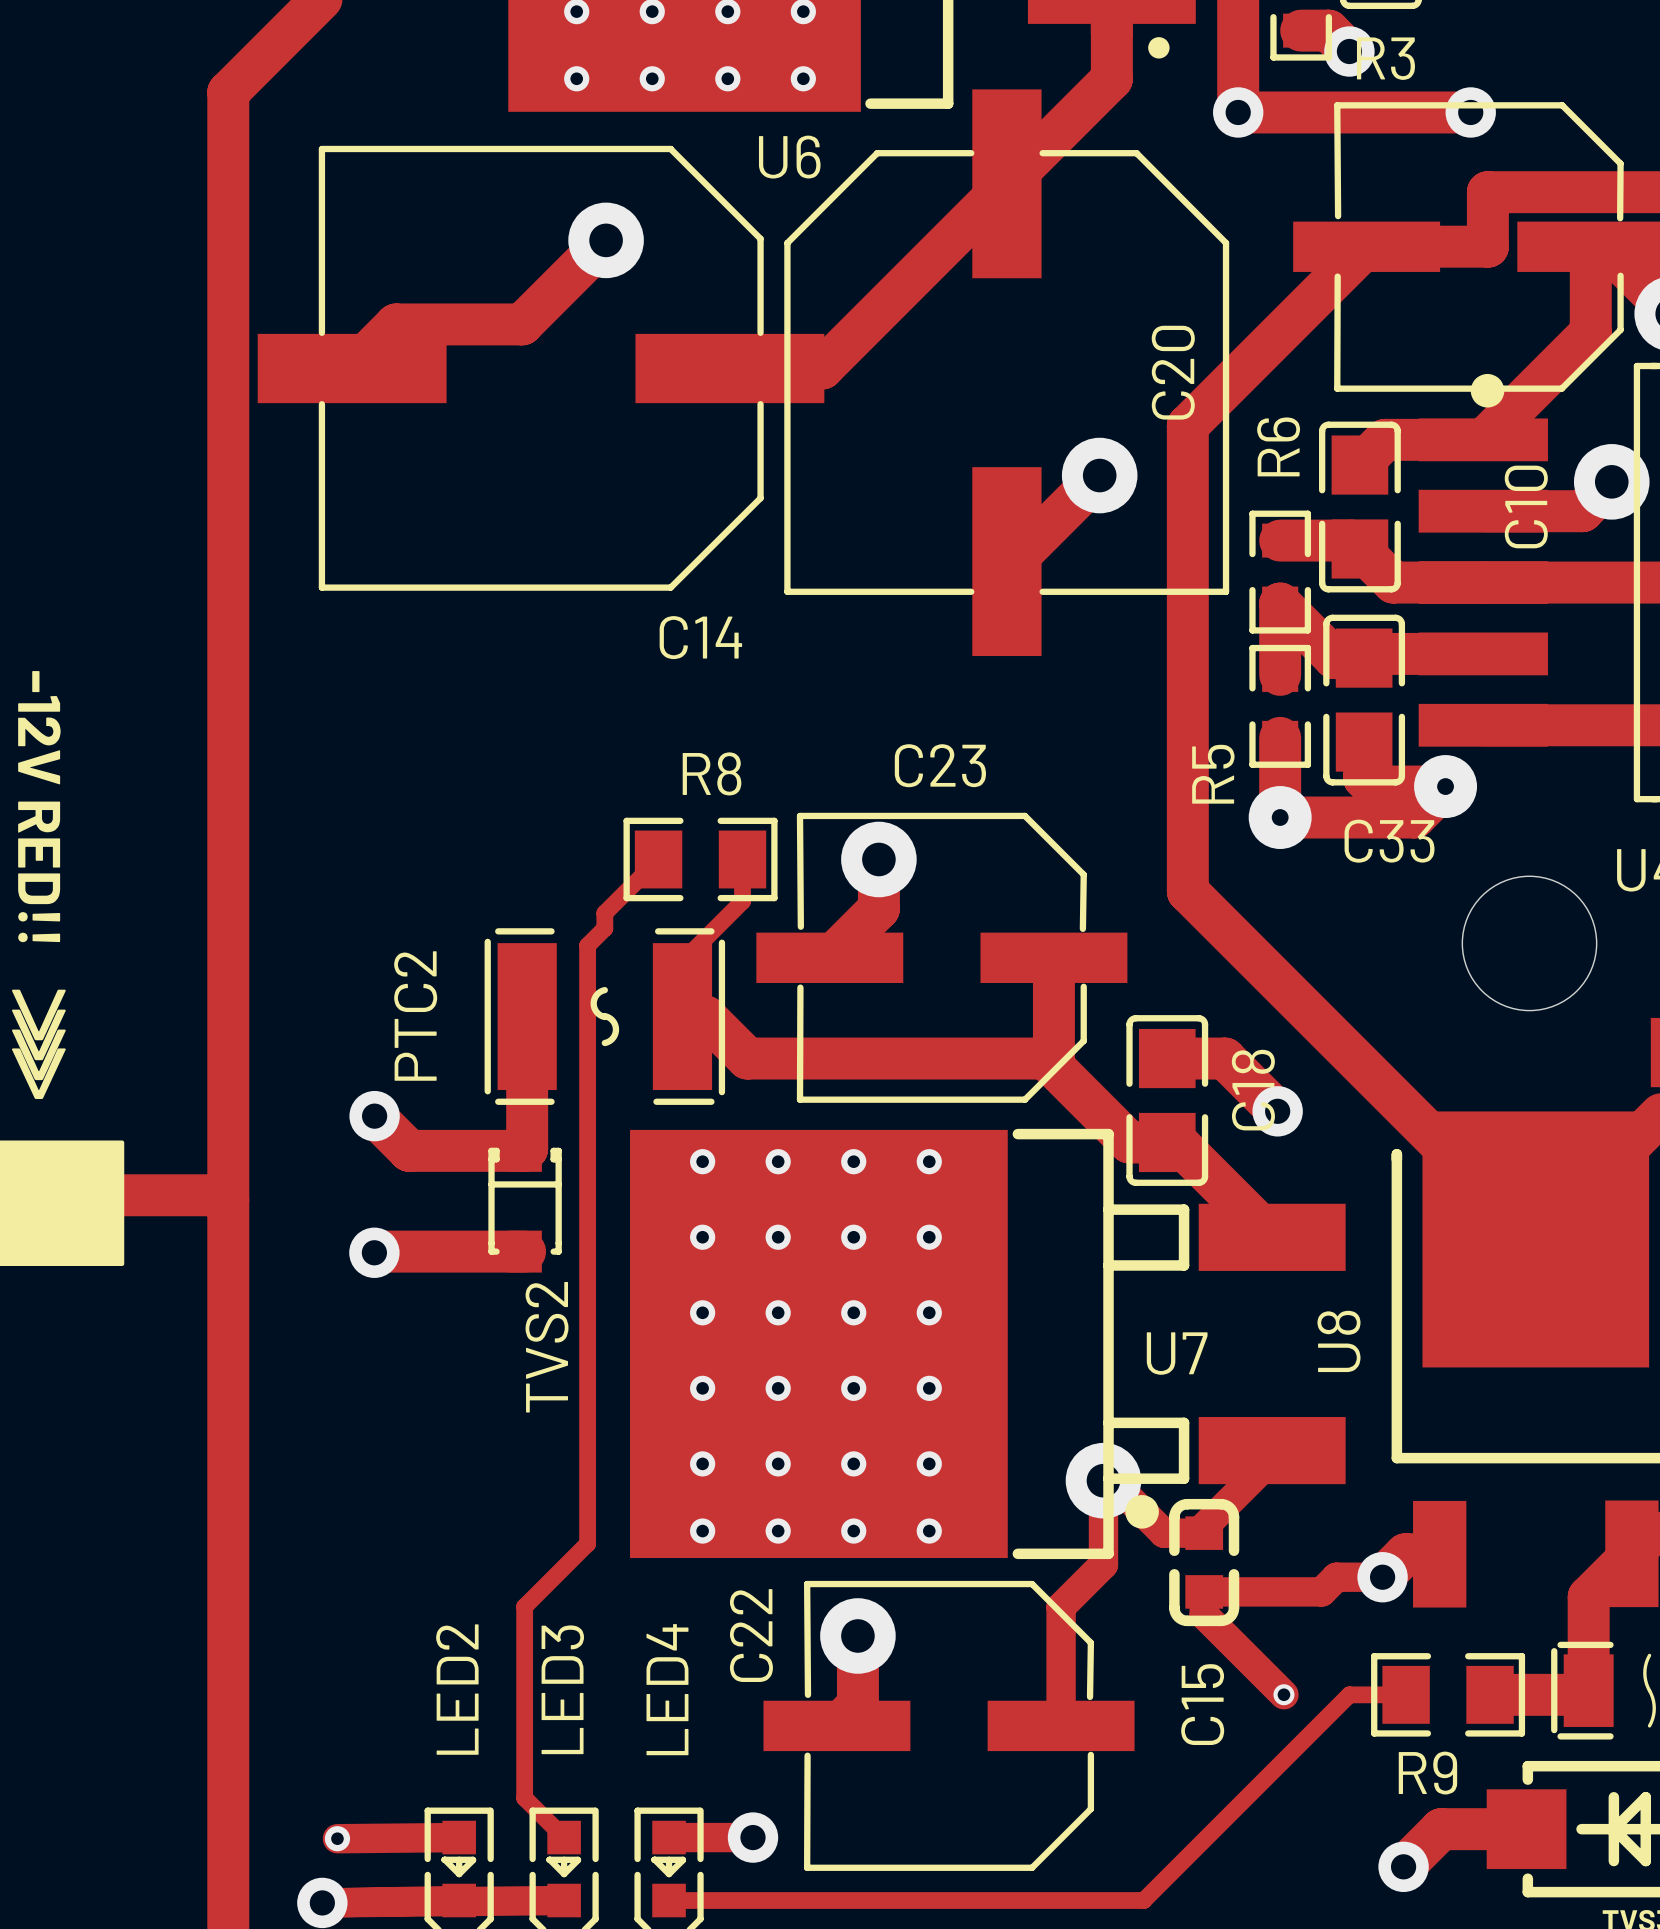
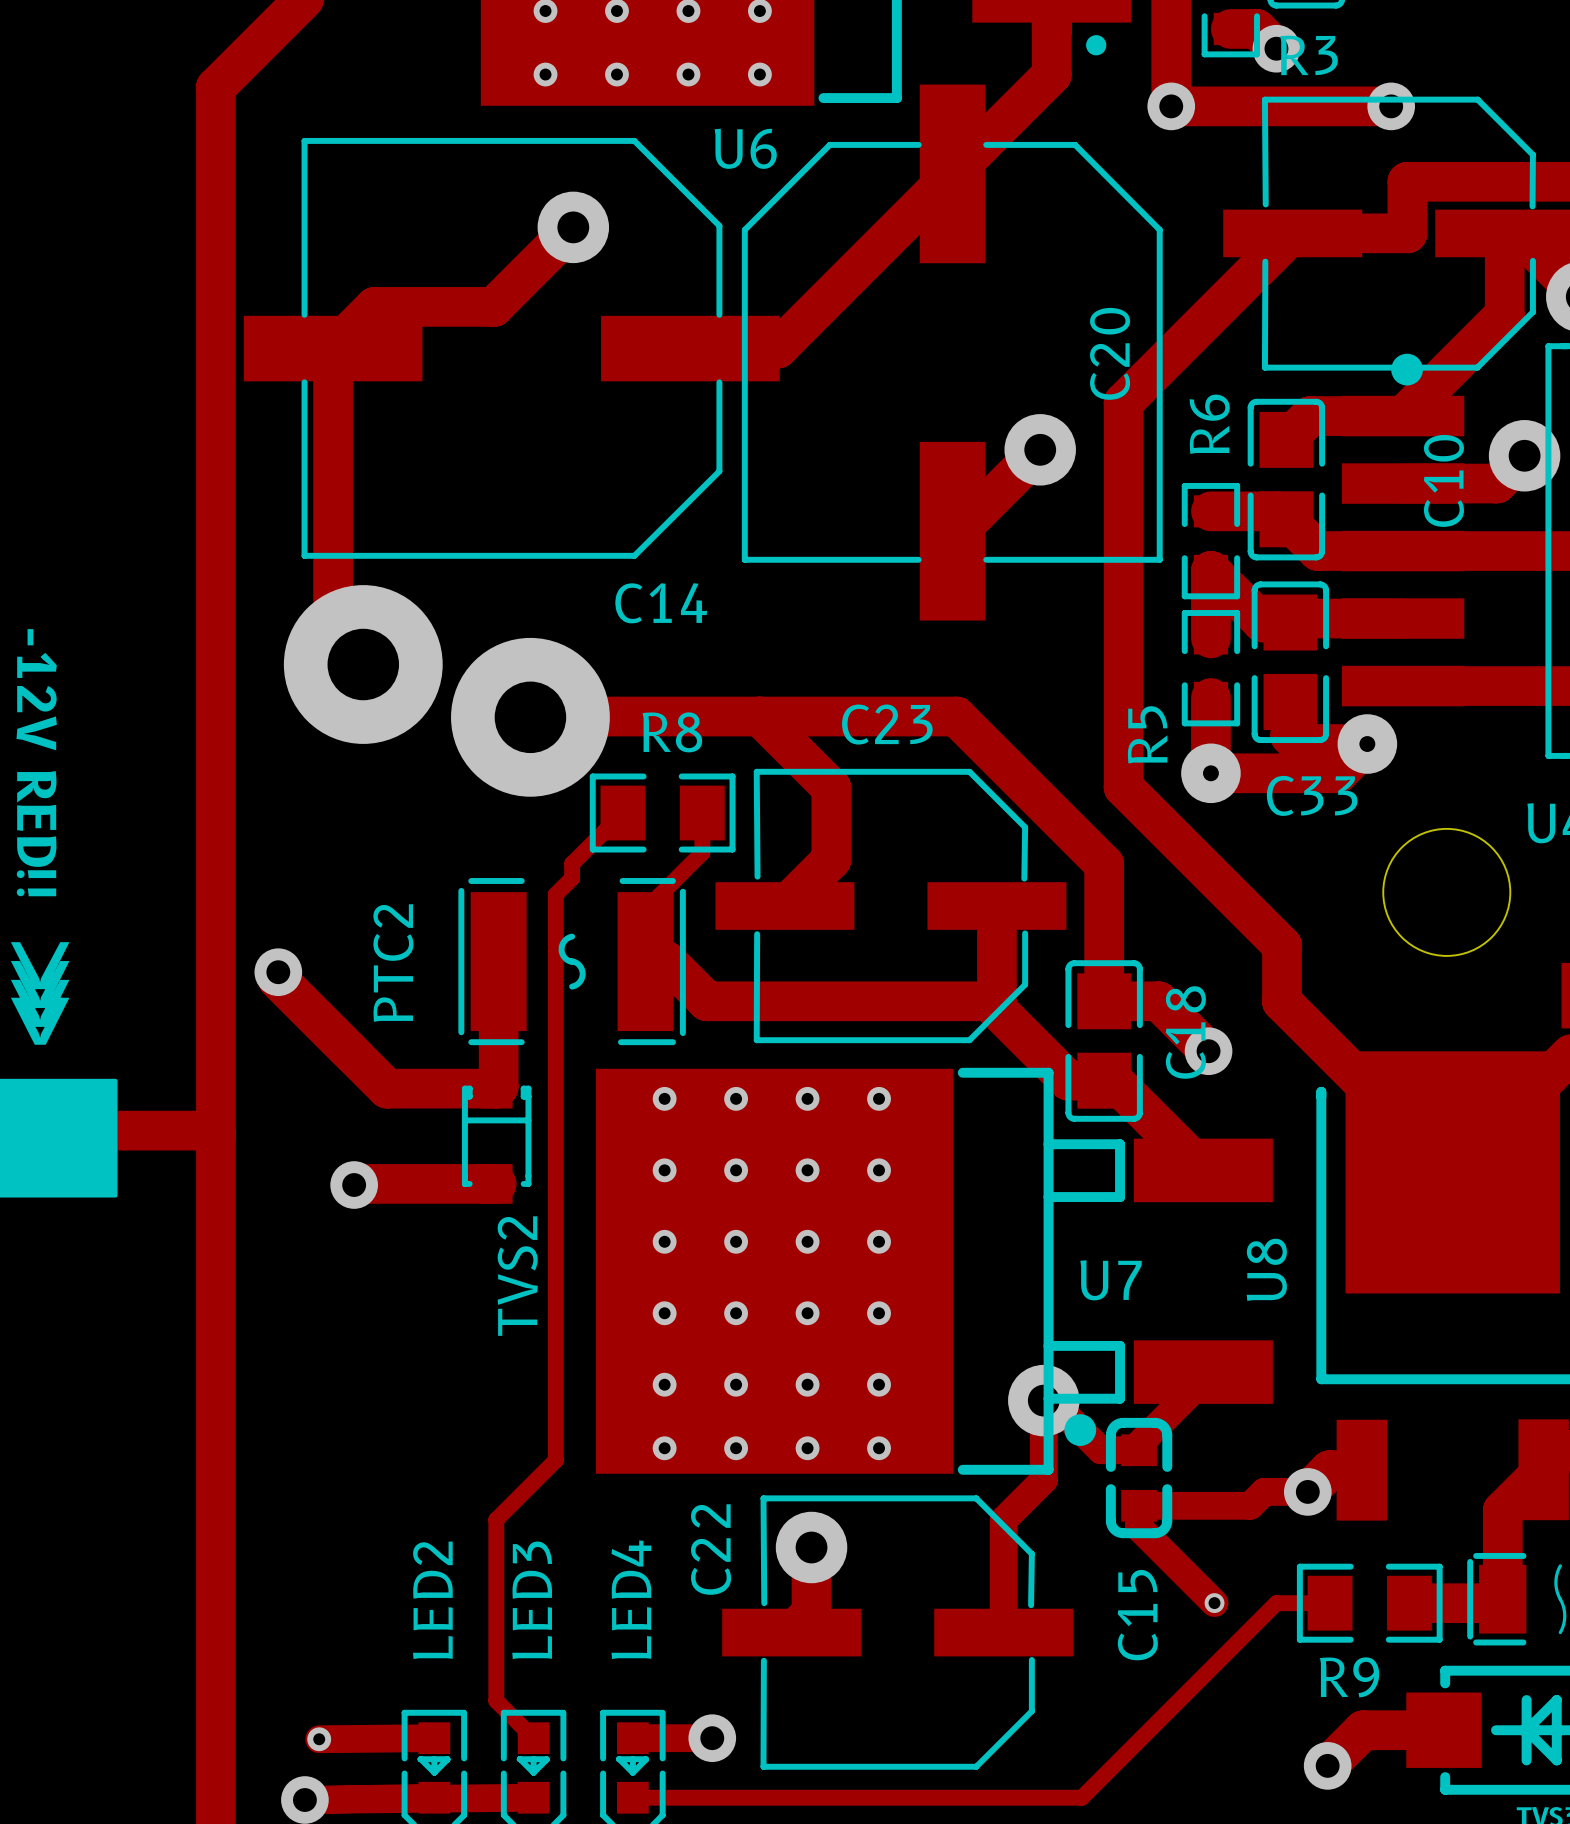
track: none -> (333, 348) (333, 643) (354, 664) (363, 664)
via: none -> (363, 664)
track: none -> (759, 716) (831, 787) (831, 813)
track: none -> (530, 717) (956, 716) (1104, 864) (1104, 1001)
via: none -> (530, 717)
track: (1187, 832) (1187, 891) (1355, 1058) -> (1123, 787) (1282, 945) (1282, 1001)
via: (878, 859) -> none
via position: (374, 1116) -> (278, 972)

